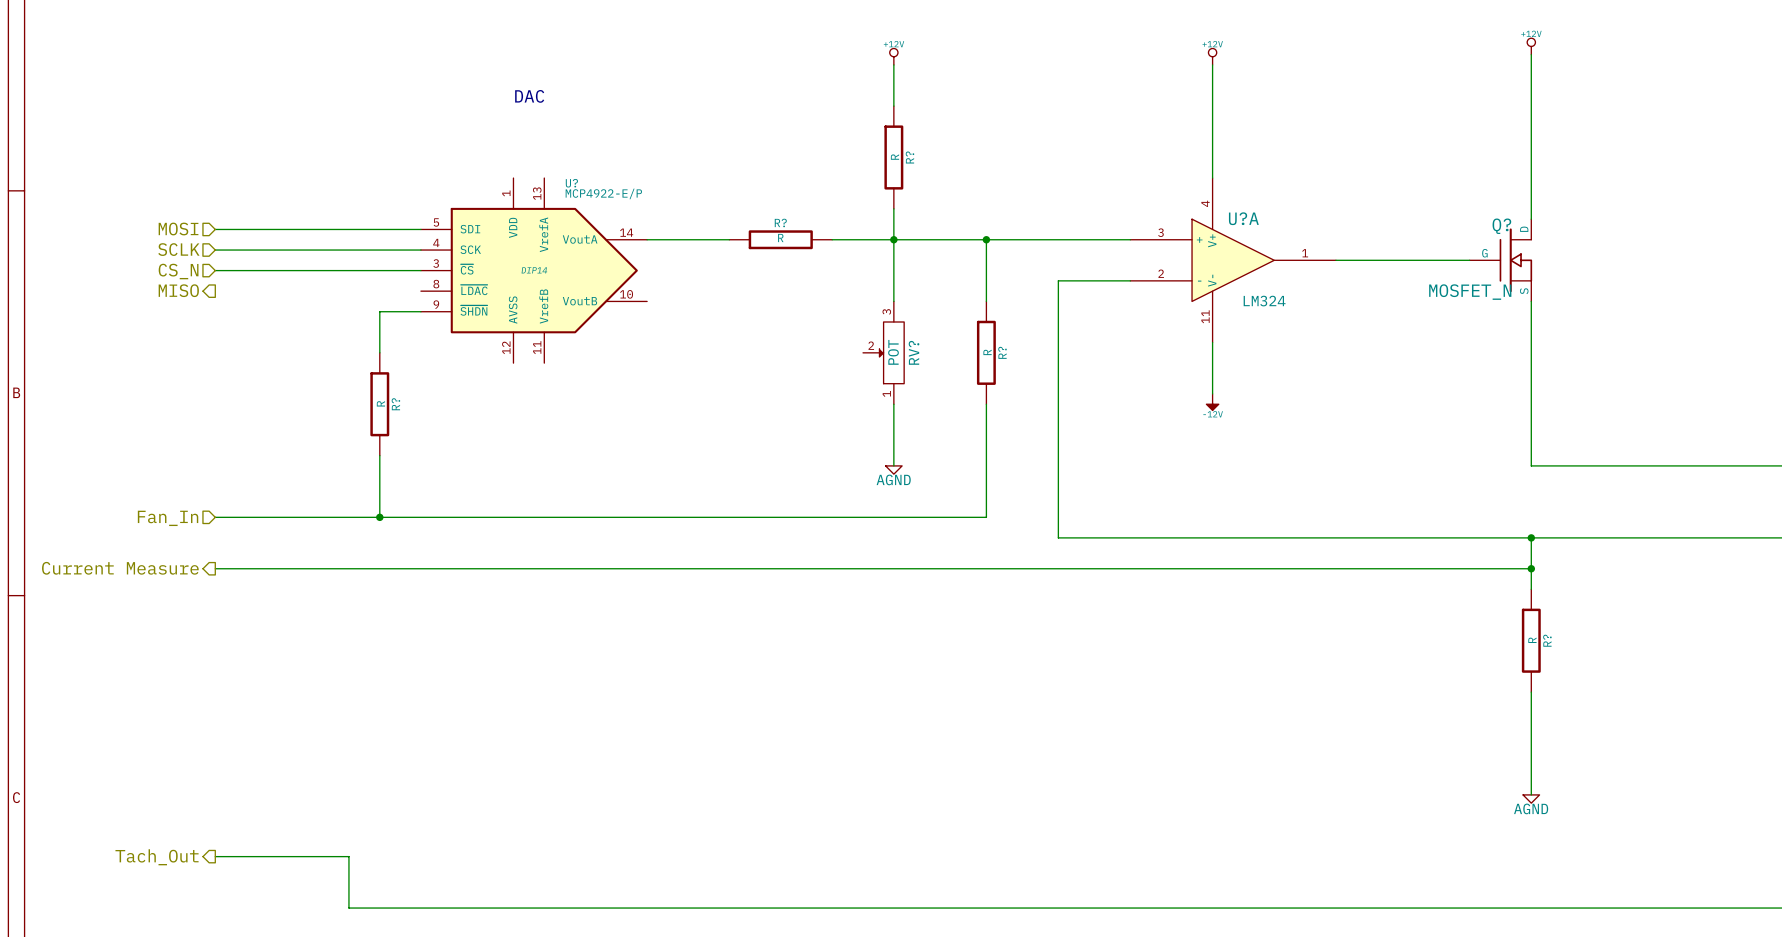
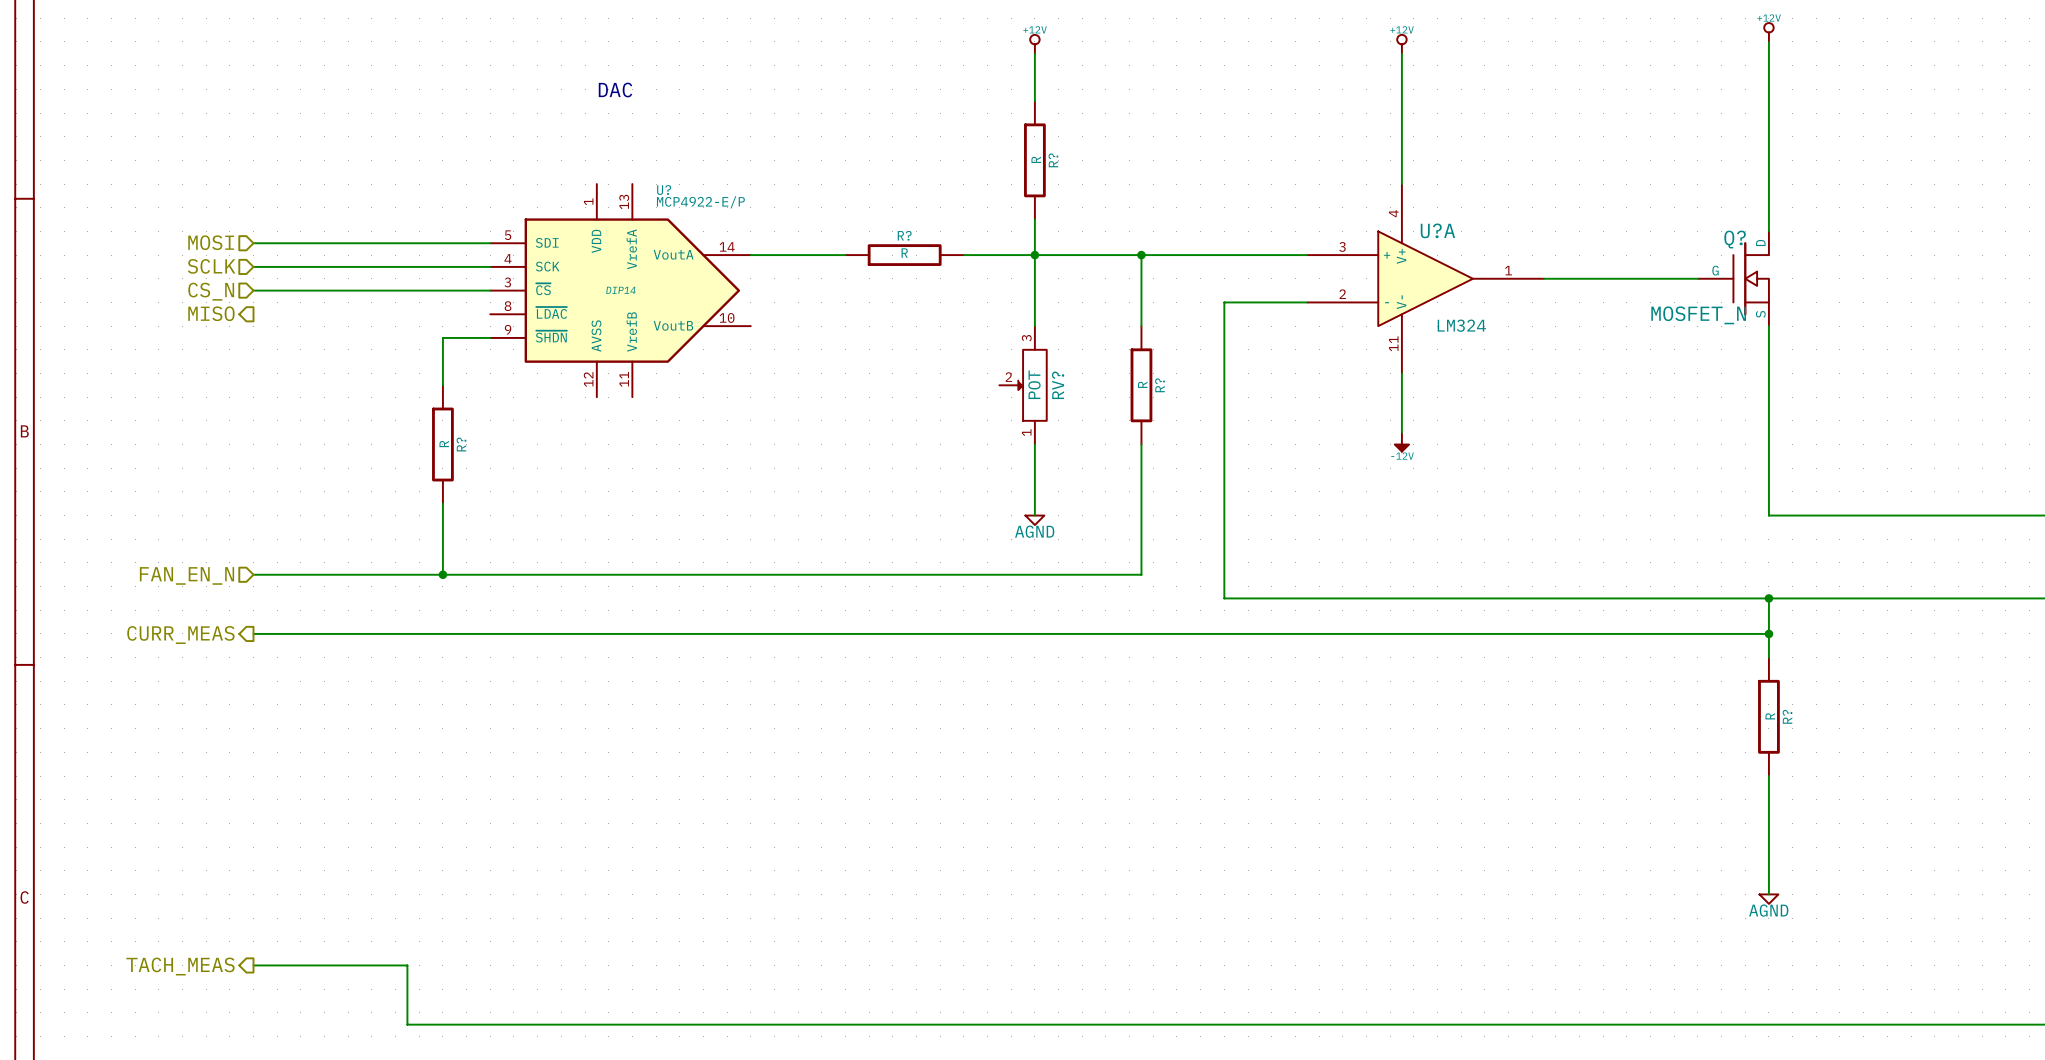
hierarchical label: Fan_In (168, 518) -> FAN_EN_N (186, 575)
hierarchical label: Current Measure (120, 568) -> CURR_MEAS (180, 635)
hierarchical label: Tach_Out (157, 857) -> TACH_MEAS (180, 966)

